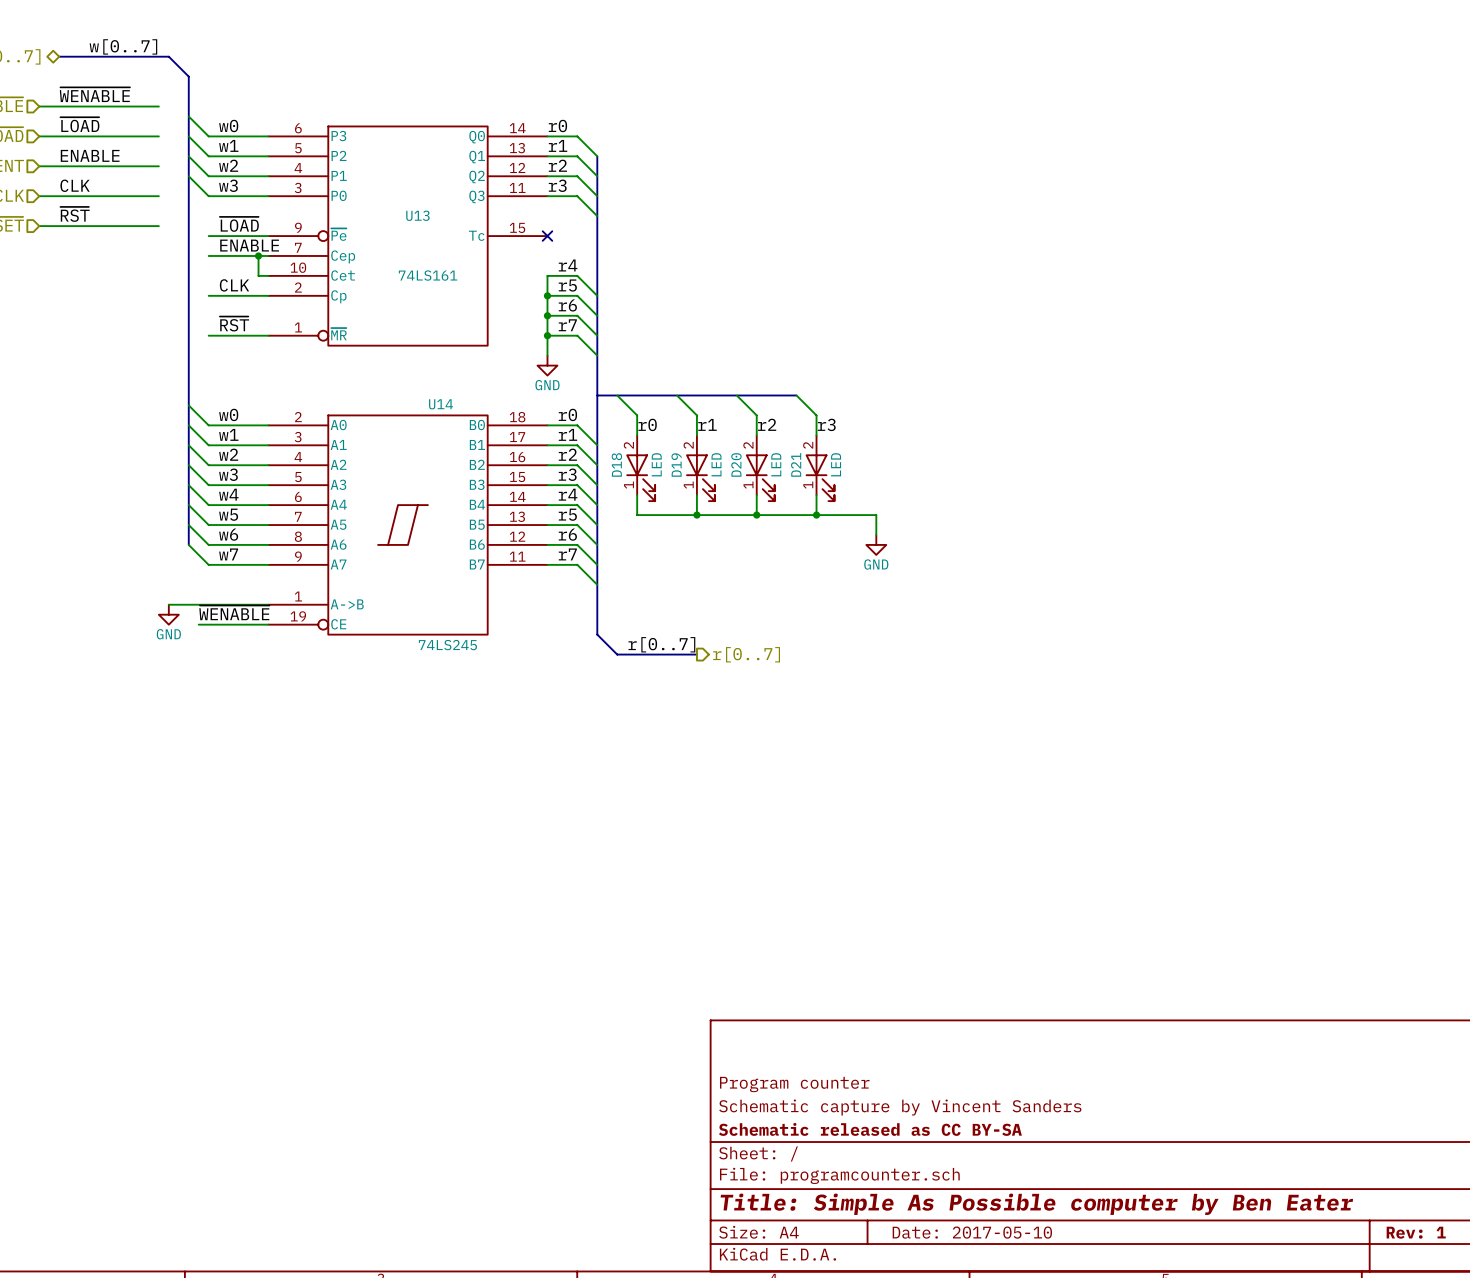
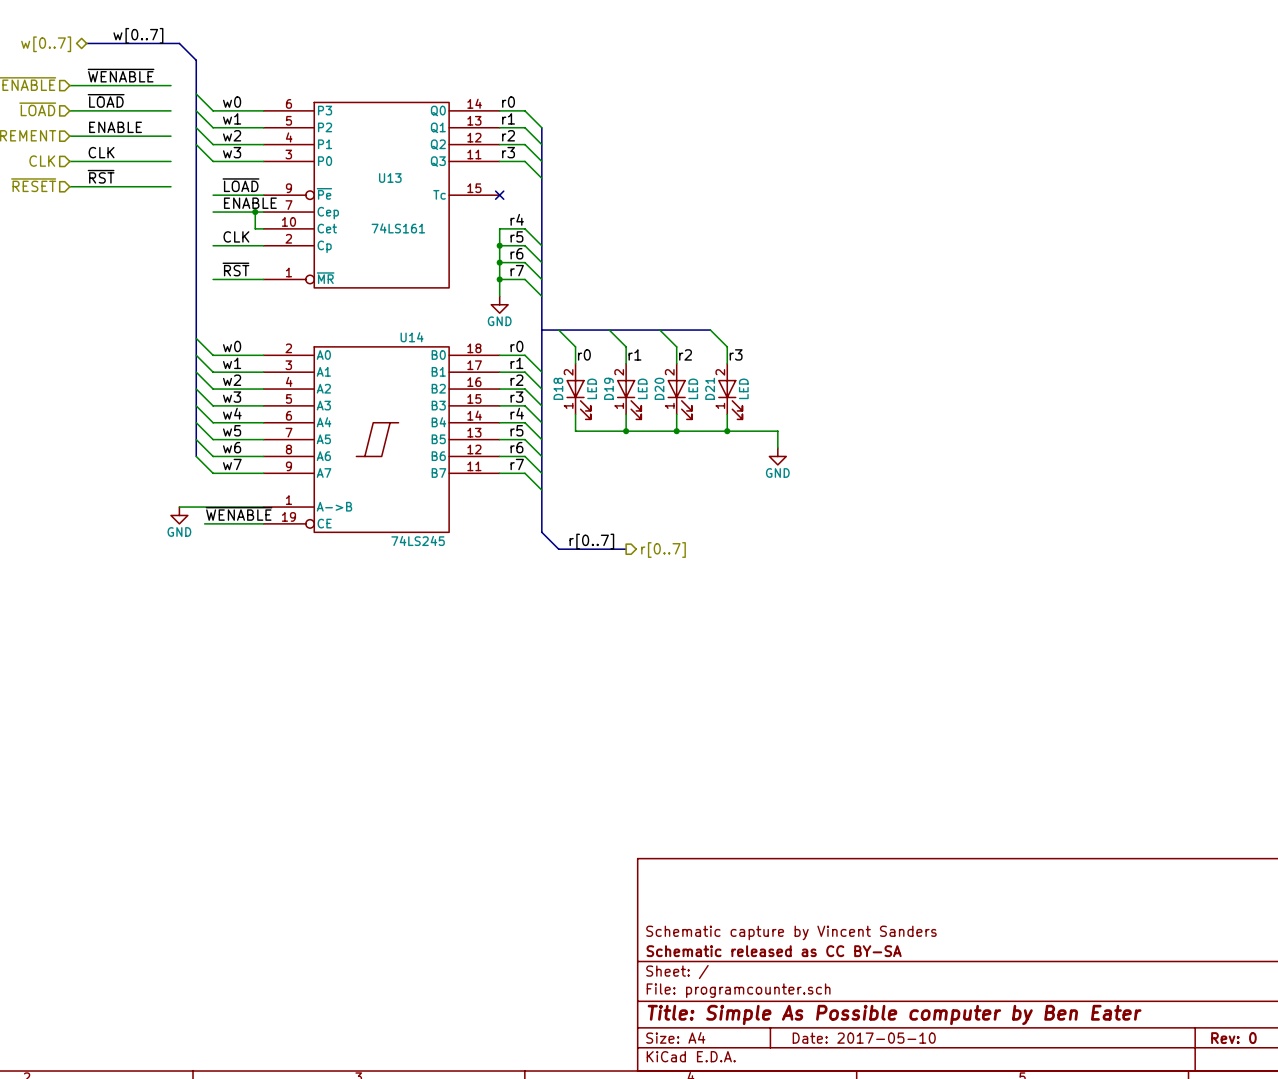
title block: Program counter (794, 1084) -> none
title block: Rev: 1 (1416, 1232) -> Rev: 0 (1233, 1038)

